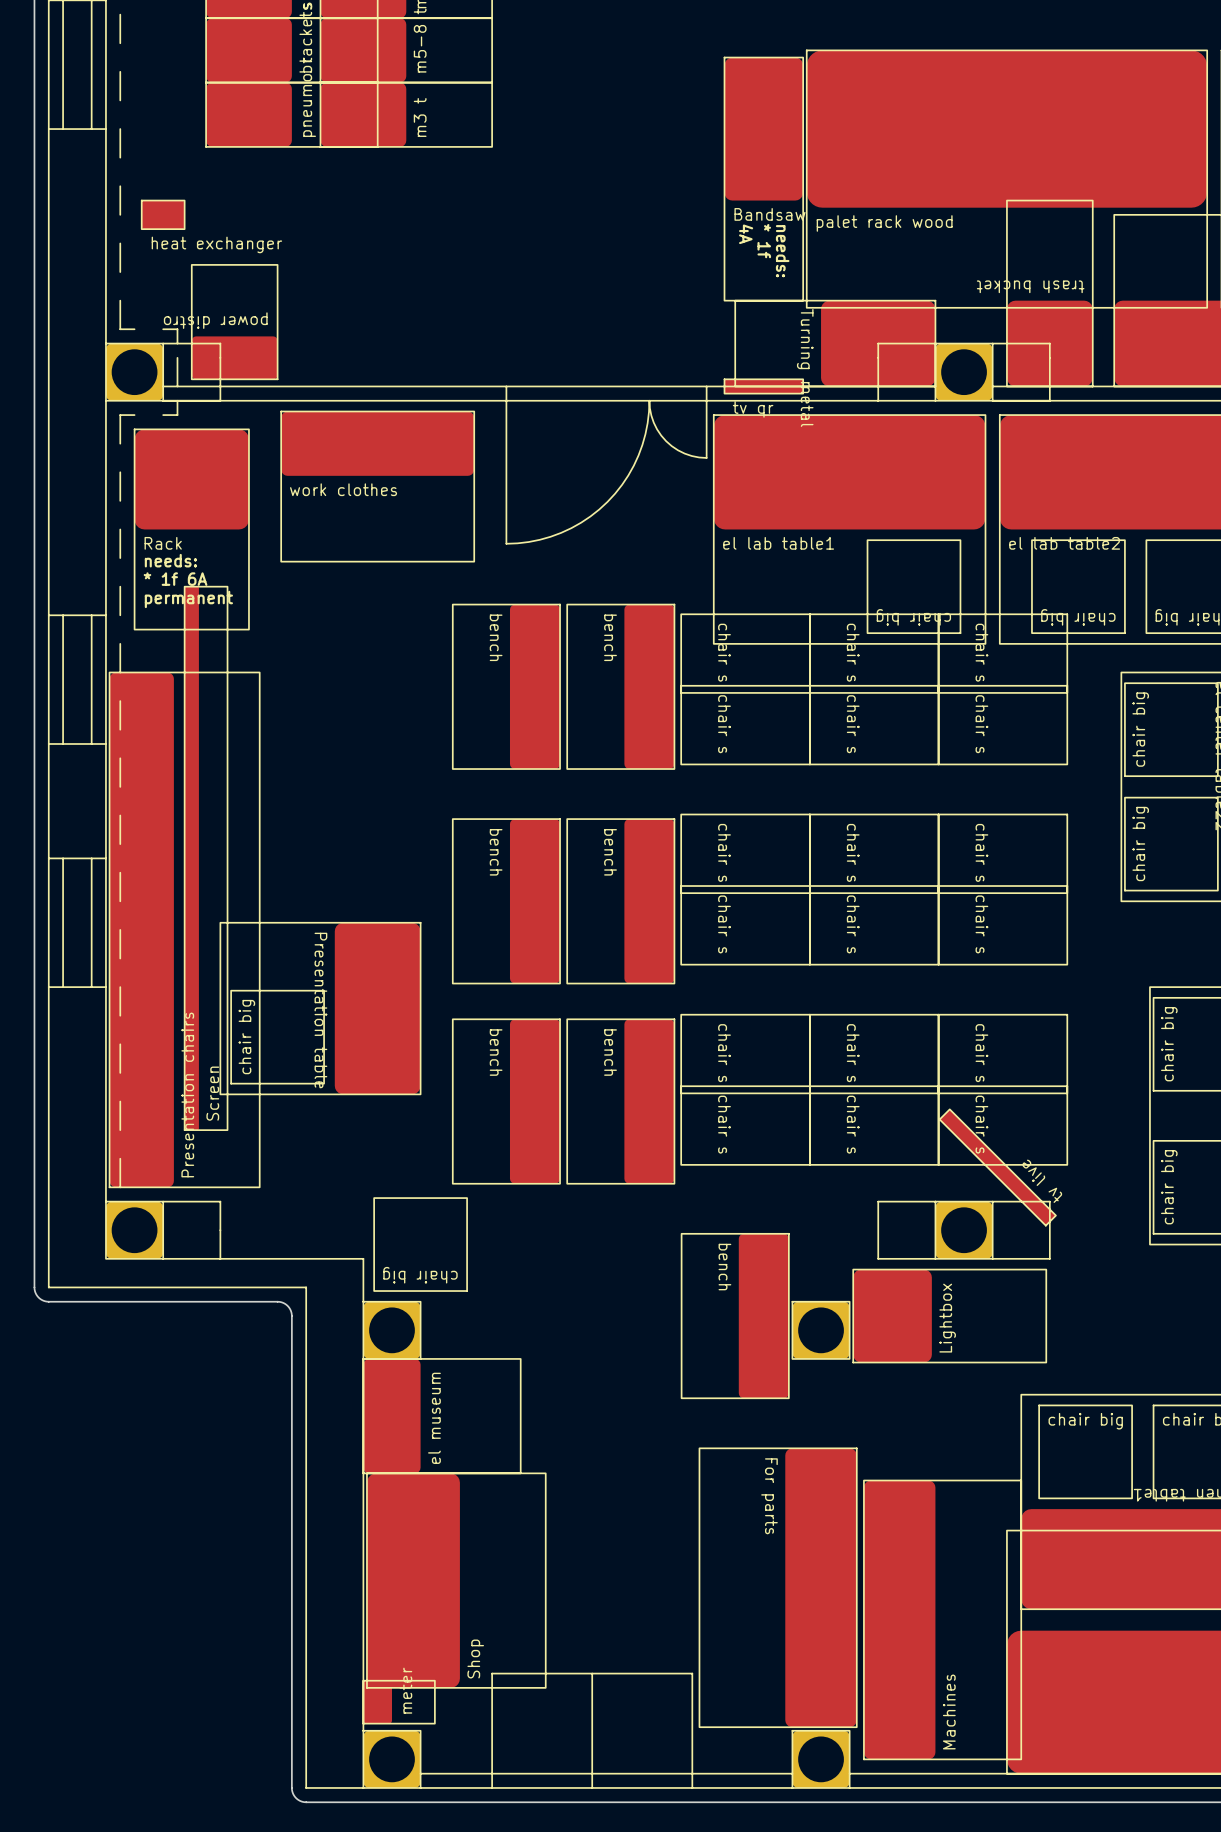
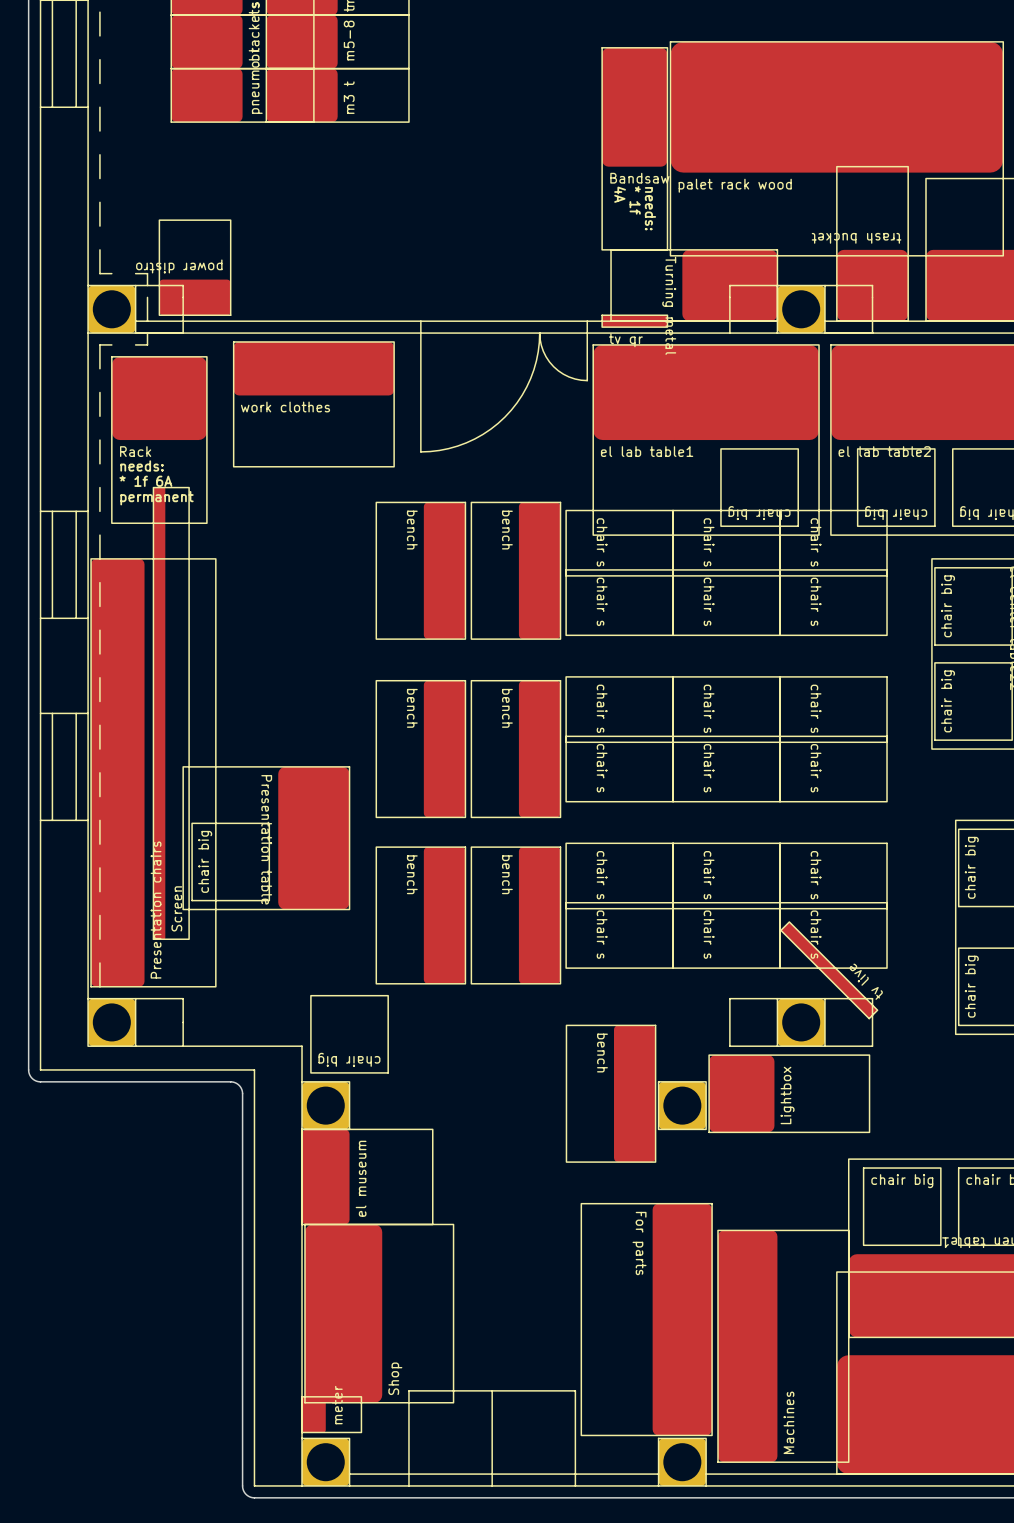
part: heat exchanger (163, 214) -> none

